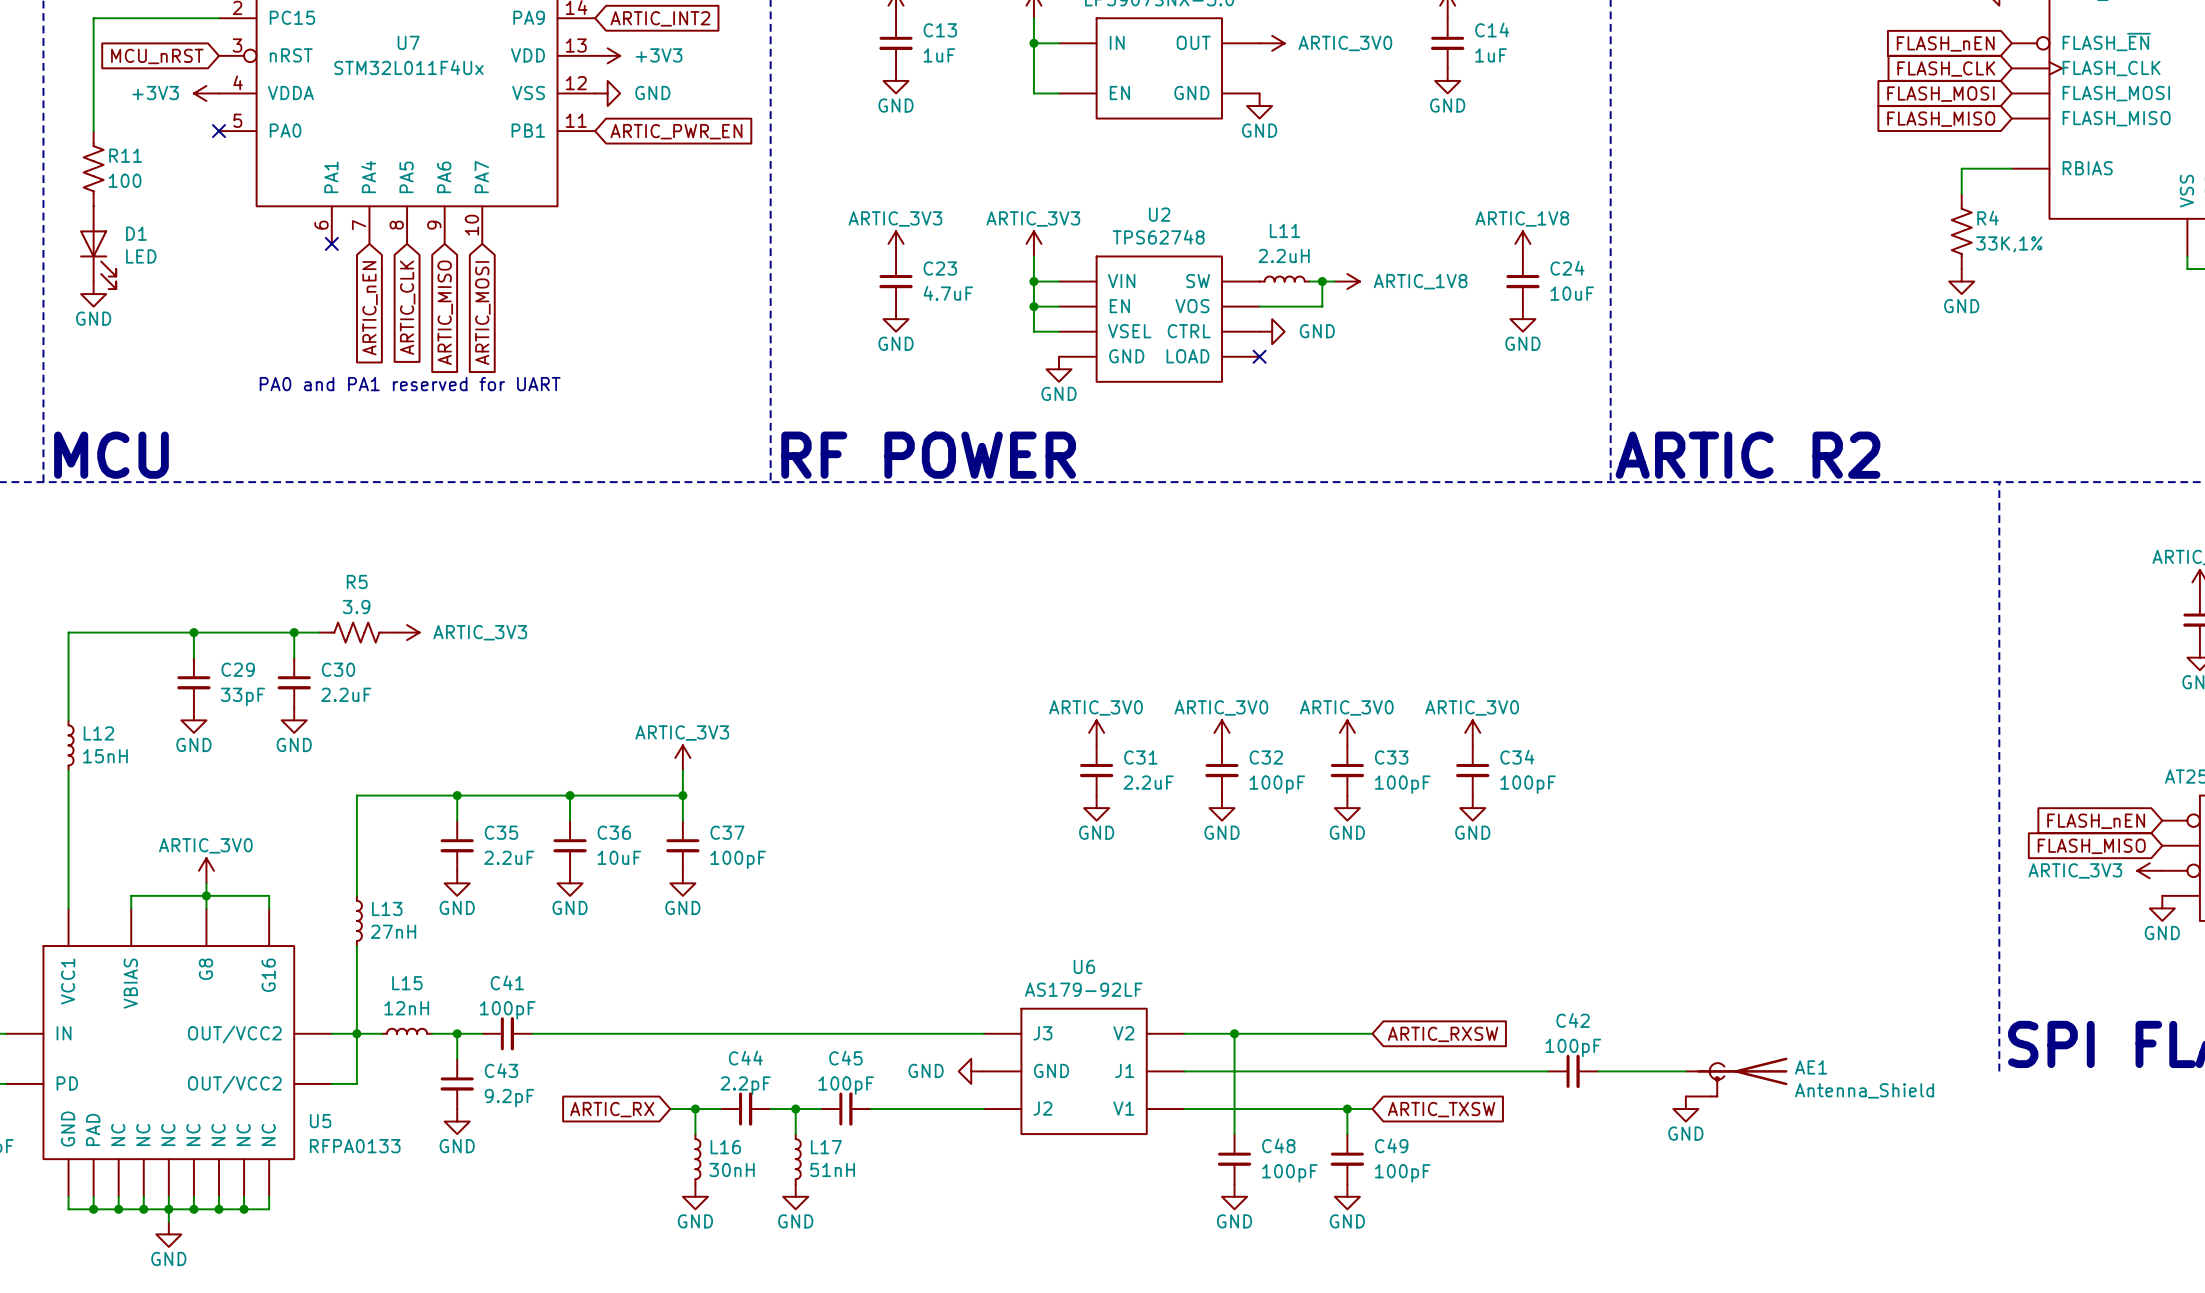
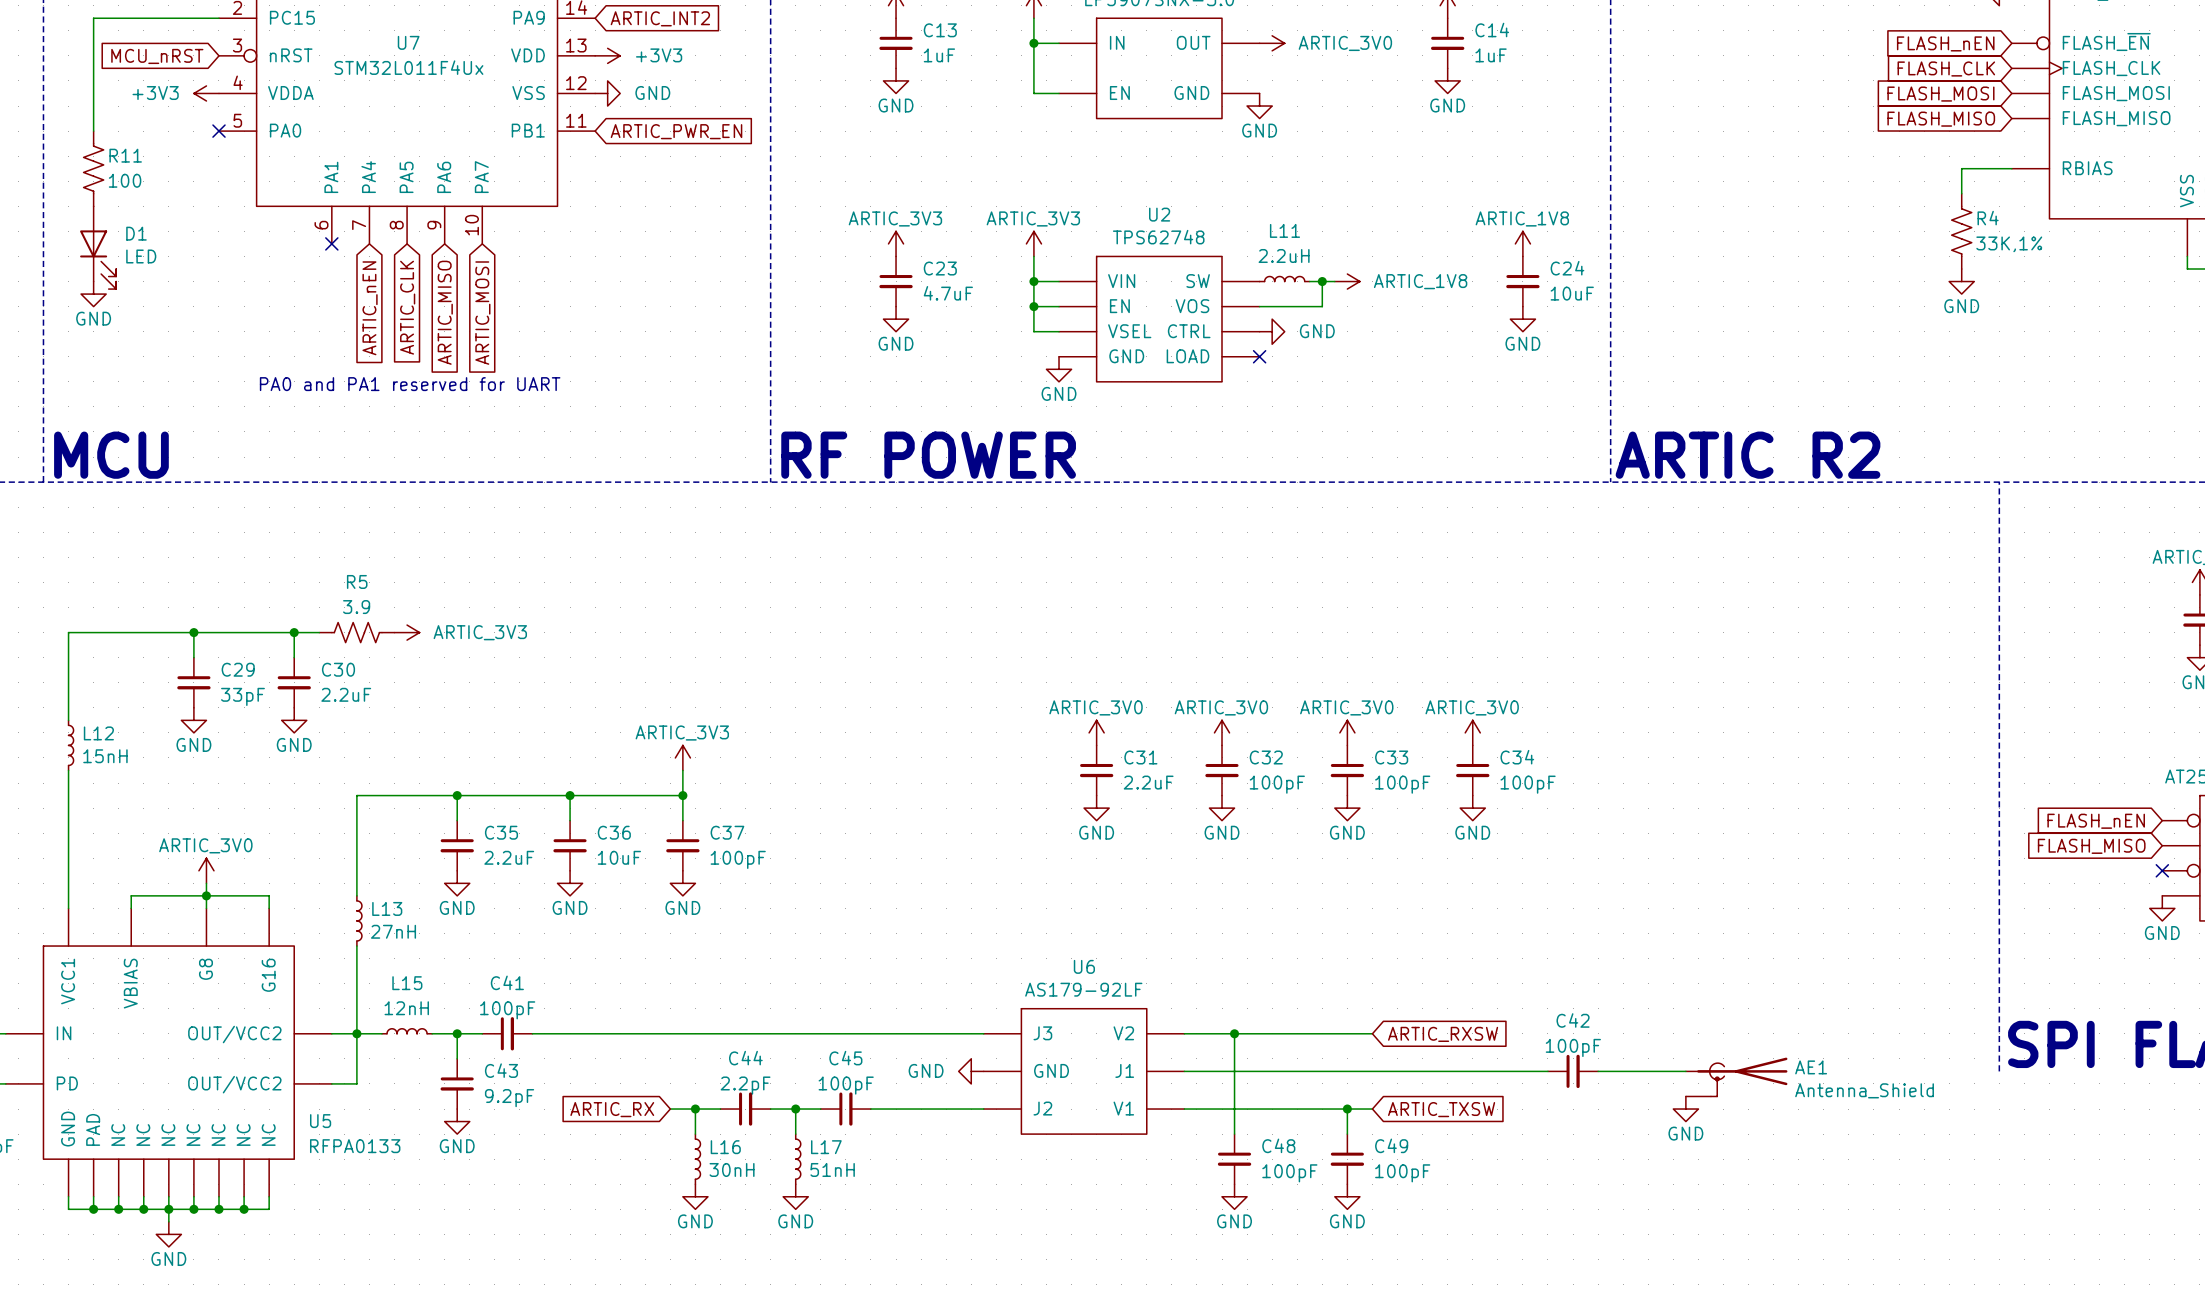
power symbol: ARTIC_3V3 (2149, 870) -> none
no-connect mark: none -> (2162, 870)

